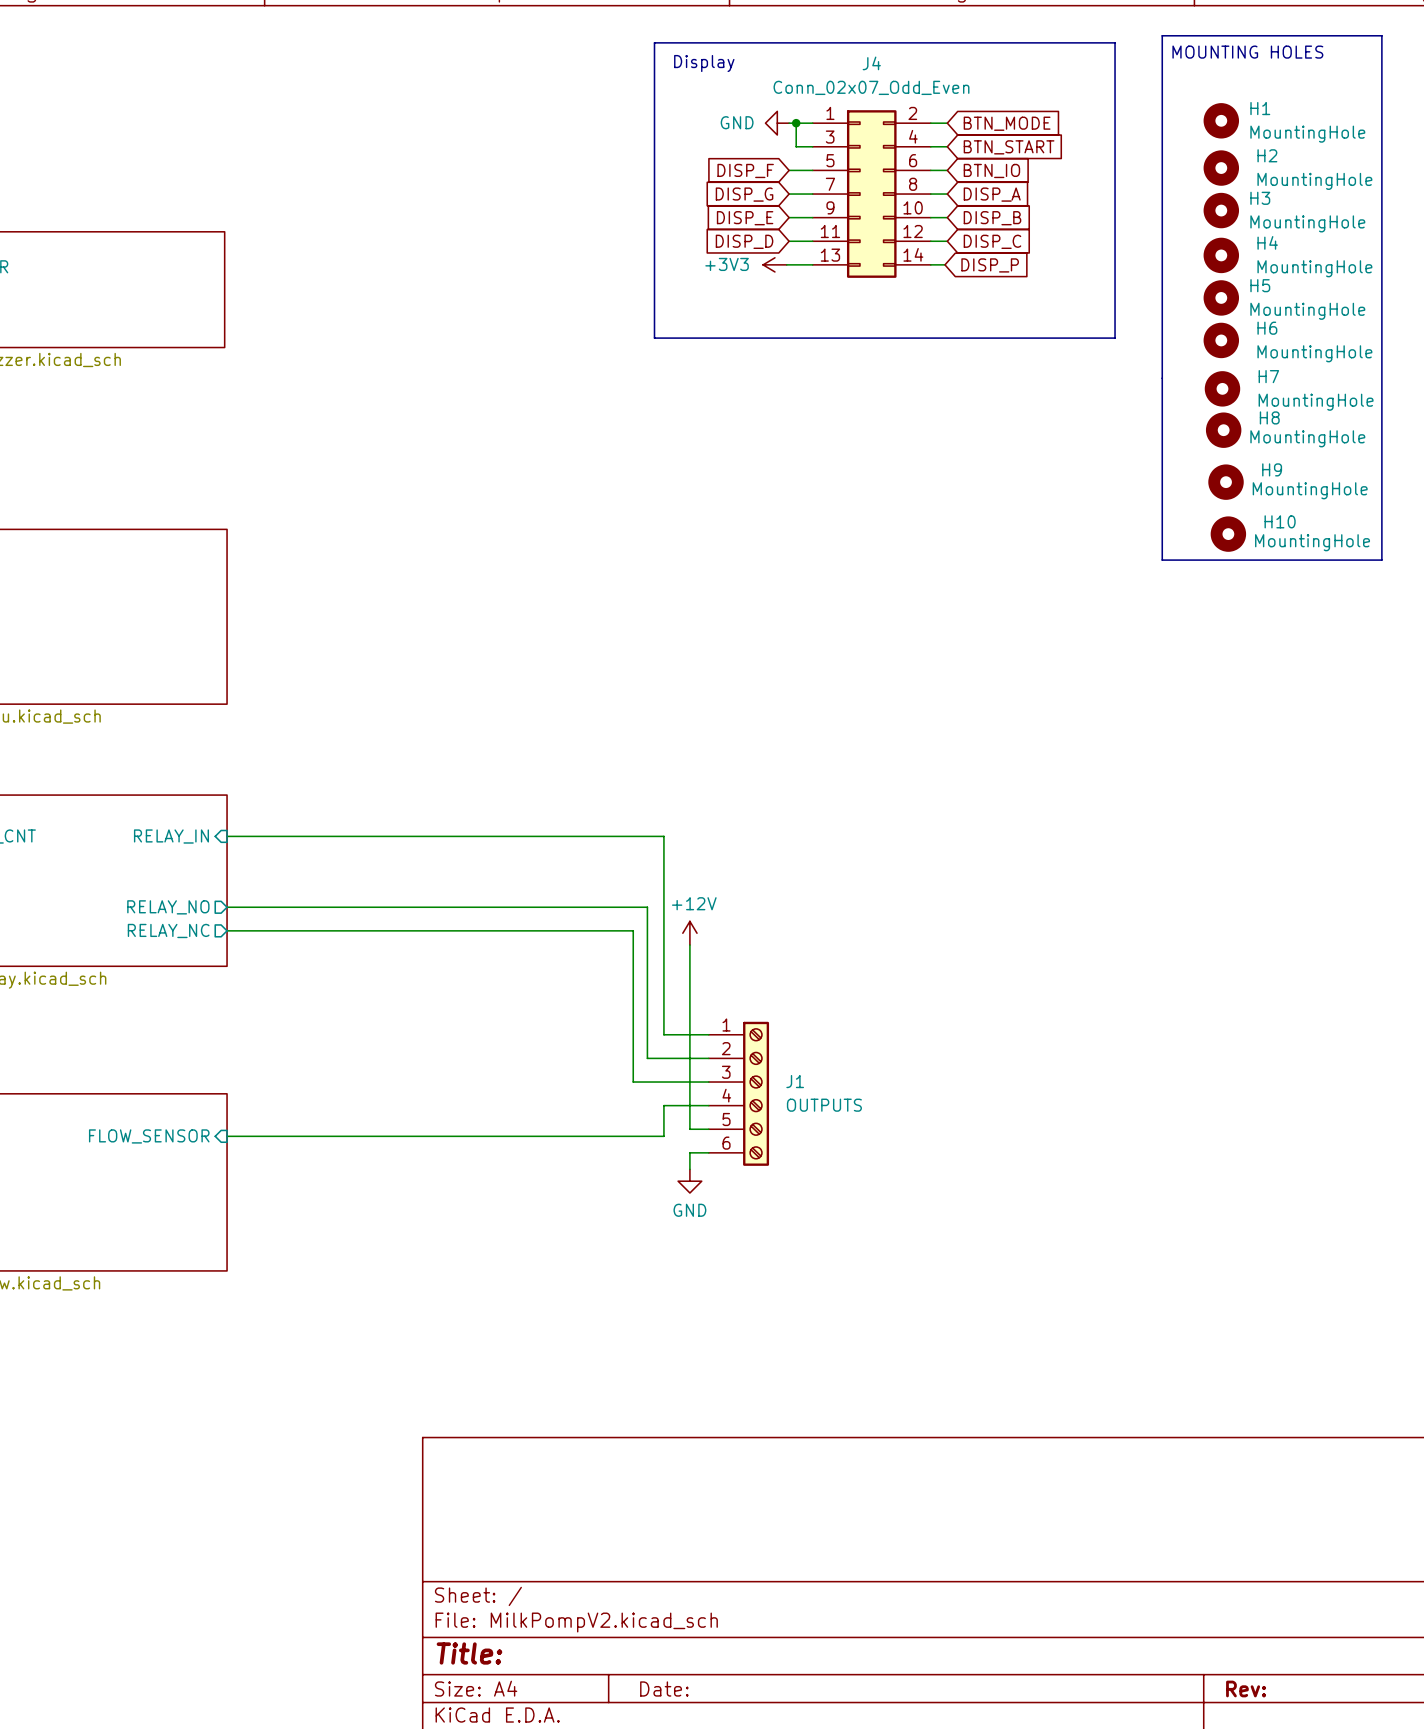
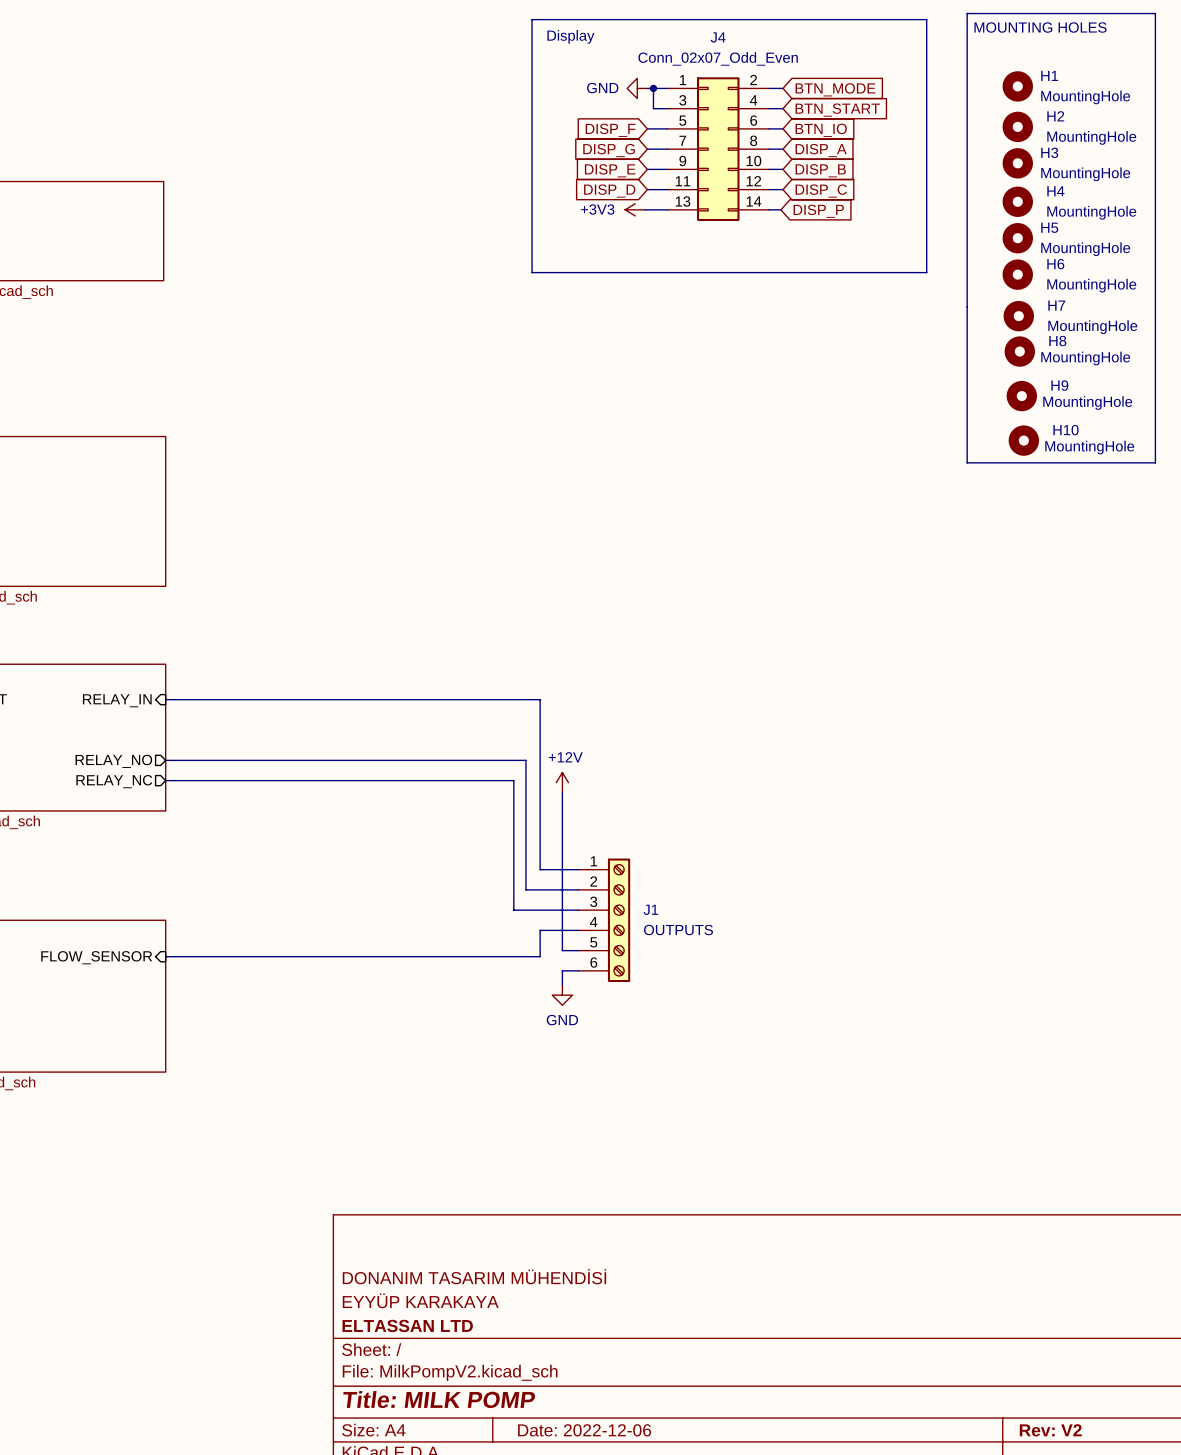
title block: none -> DONANIM TASARIM MÜHENDİSİ (474, 1276)
title block: none -> EYYÜP KARAKAYA (420, 1300)
title block: none -> ELTASSAN LTD (407, 1325)
title block: Title: (469, 1653) -> Title: MILK POMP (439, 1399)
title block: Date: (664, 1688) -> Date: 2022-12-06 (584, 1430)
title block: Rev: (1246, 1688) -> Rev: V2 (1050, 1430)

